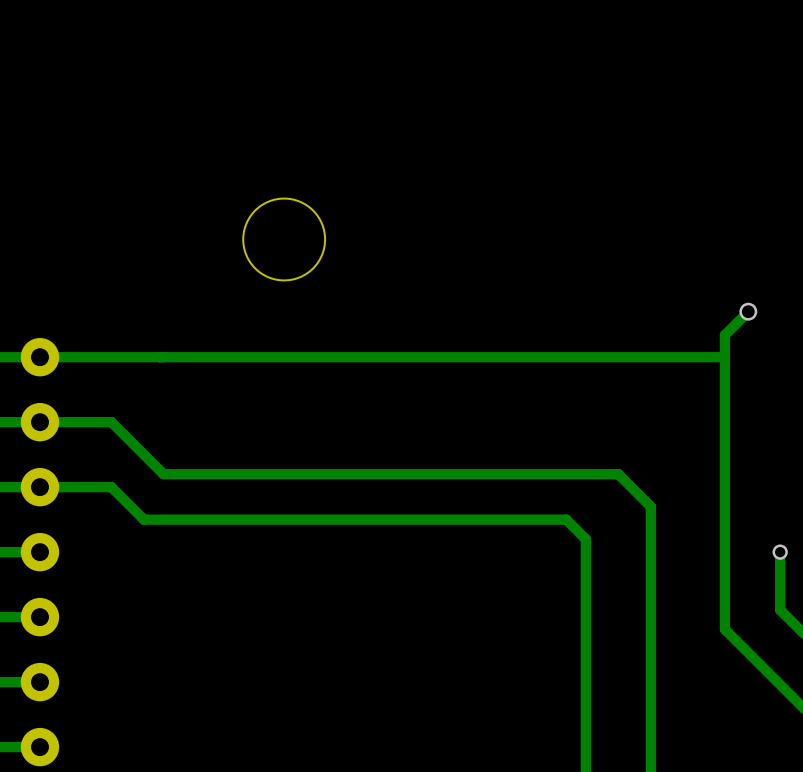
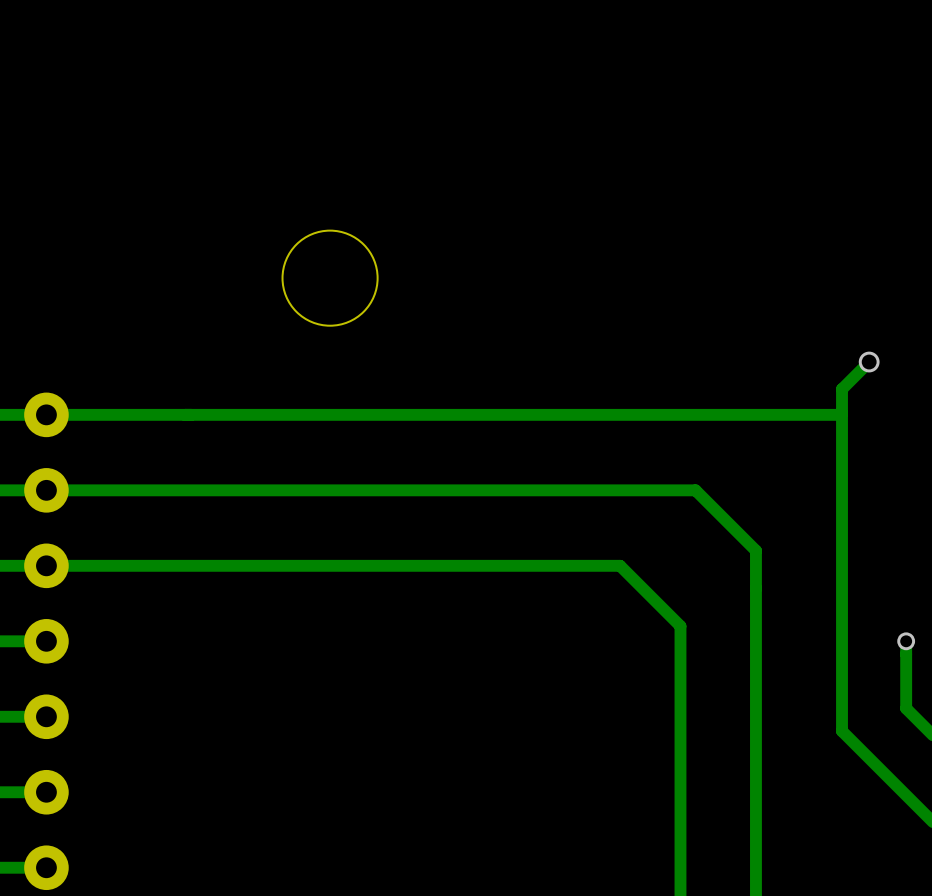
track: (111, 422) (163, 474) (618, 474) (650, 506) -> (129, 490) (695, 490) (755, 550) (755, 588)
track: (111, 487) (143, 519) (566, 519) -> (129, 565) (620, 565) (657, 603)

